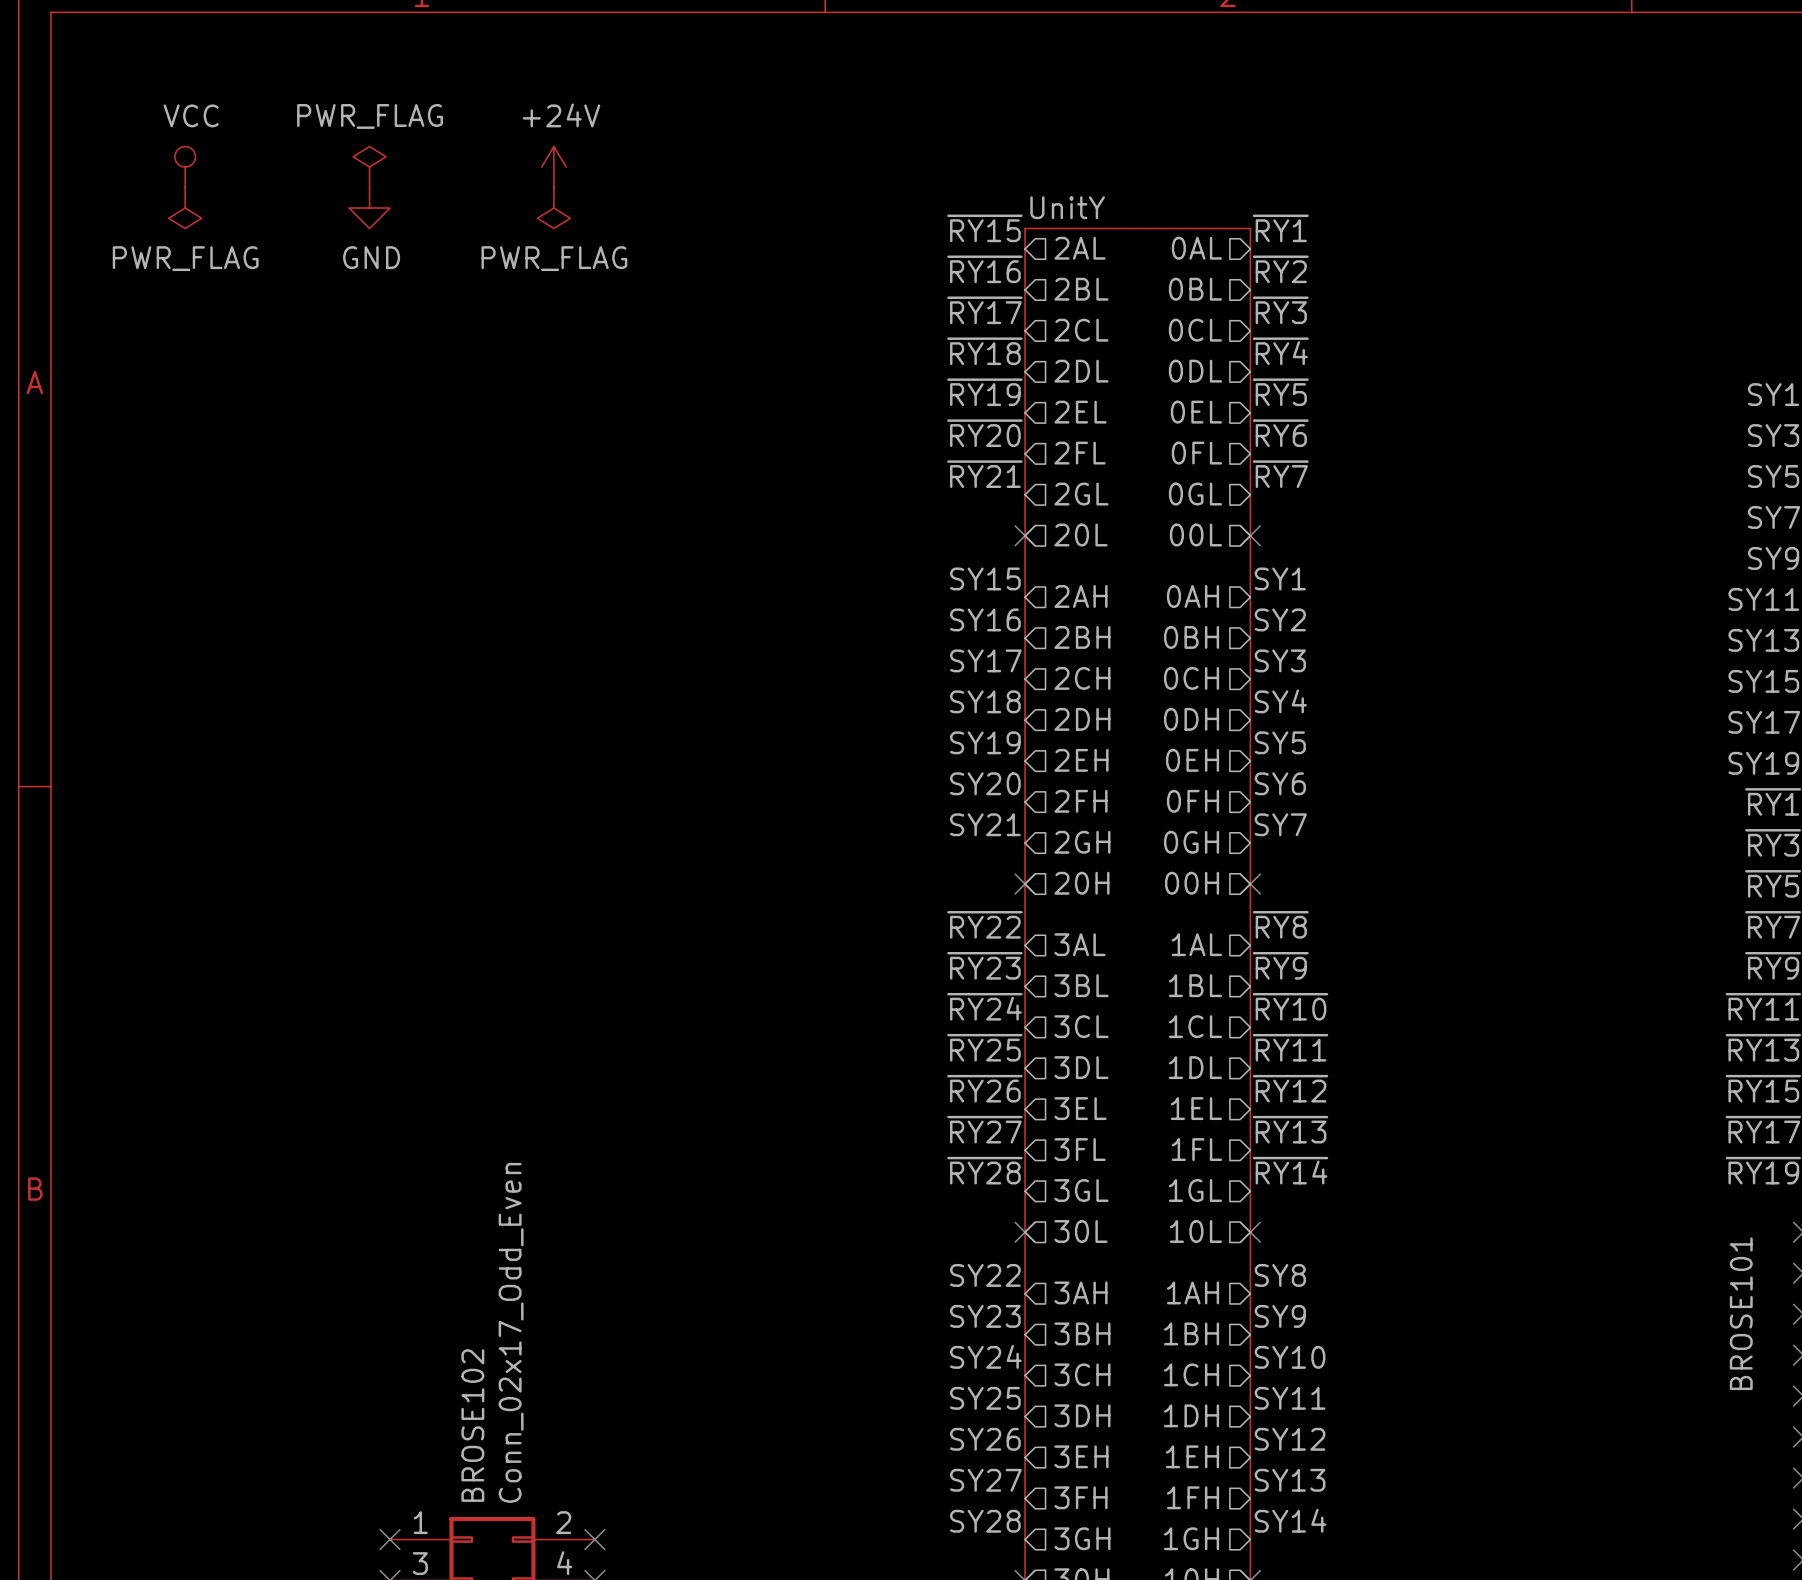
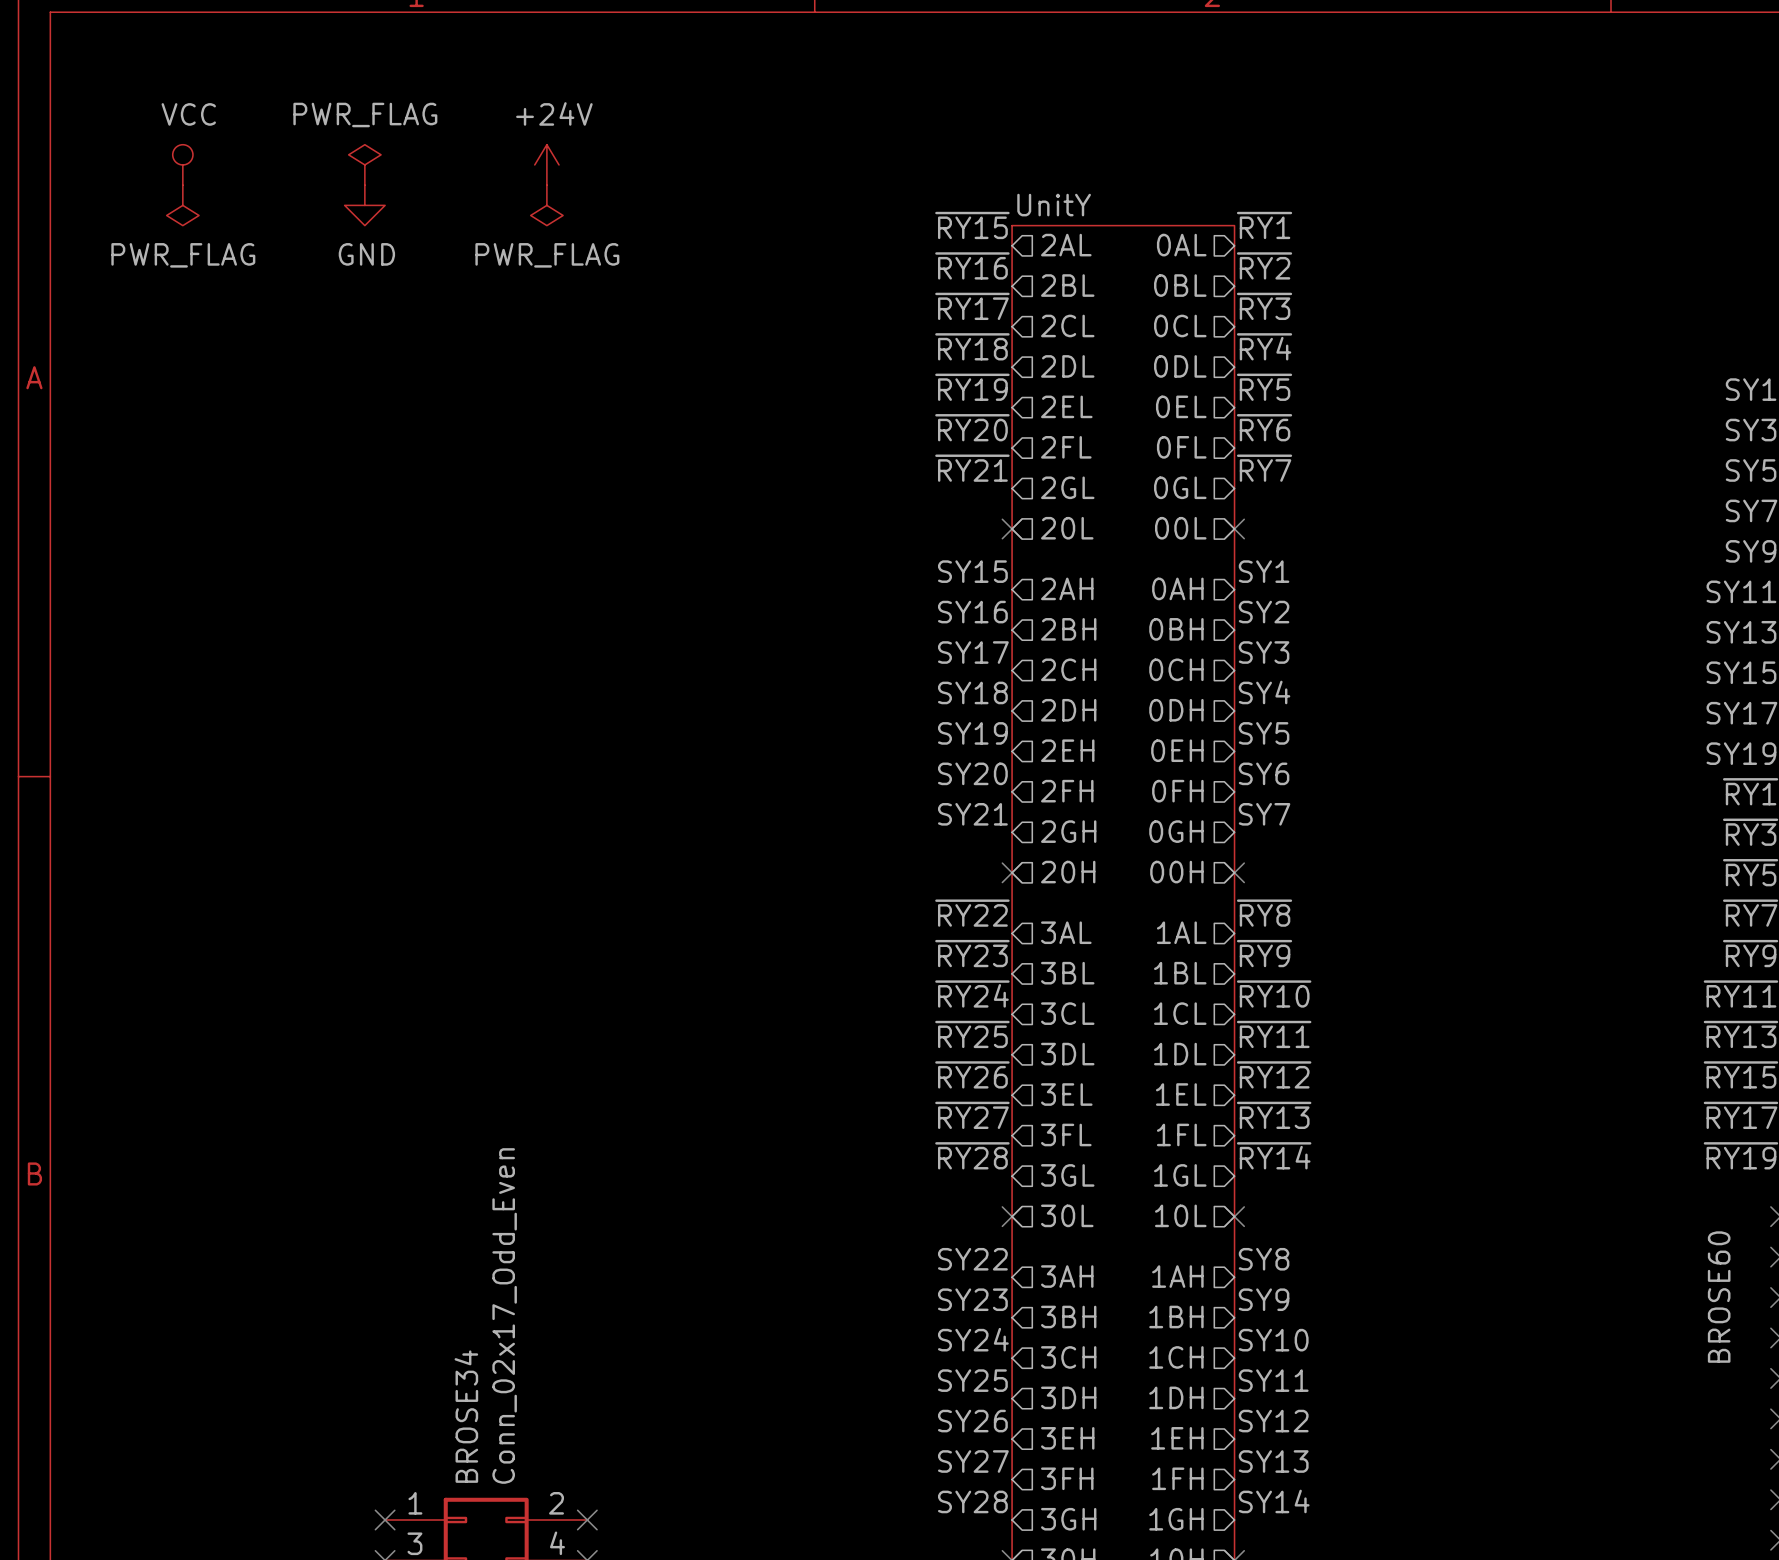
BROSE101 name: BROSE101 (1741, 1313) -> BROSE60 (1719, 1297)
BROSE102 name: BROSE102 (472, 1425) -> BROSE34 (466, 1416)

